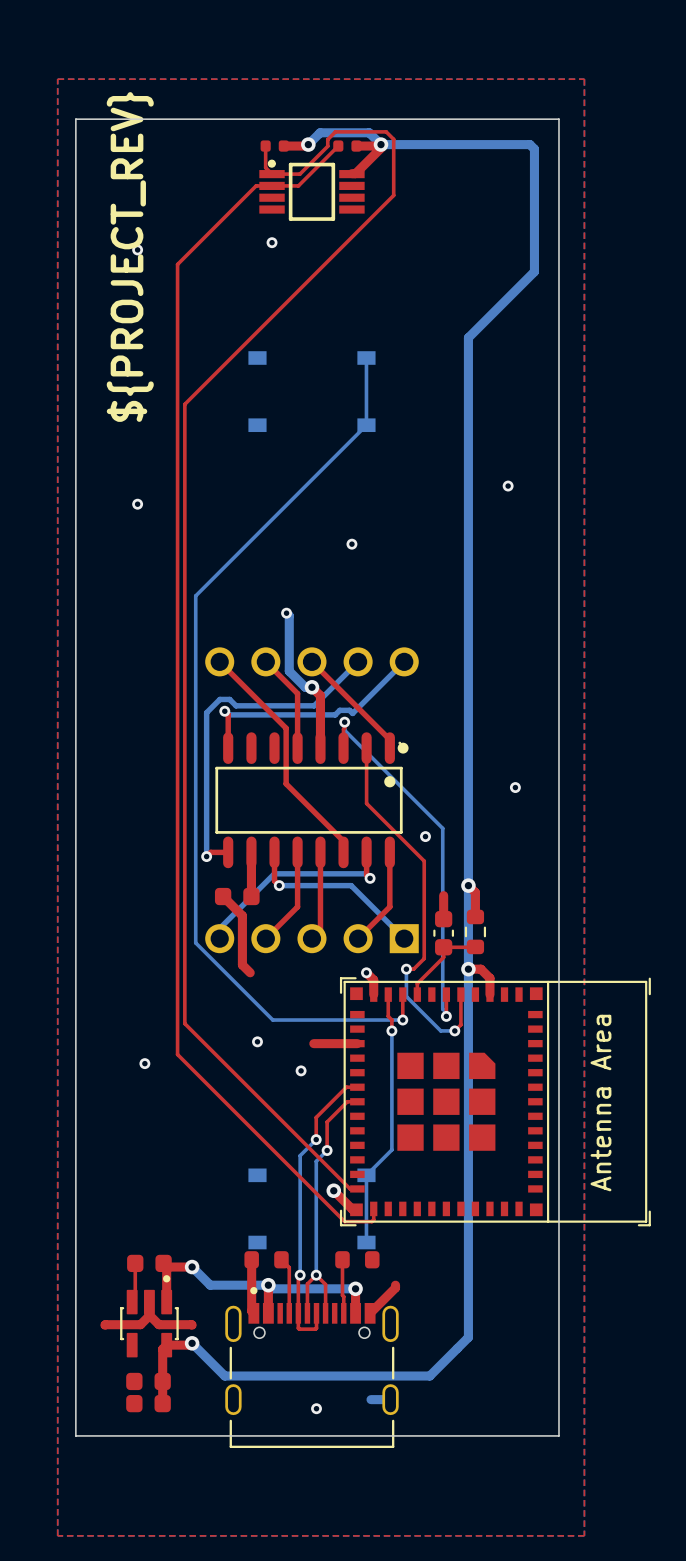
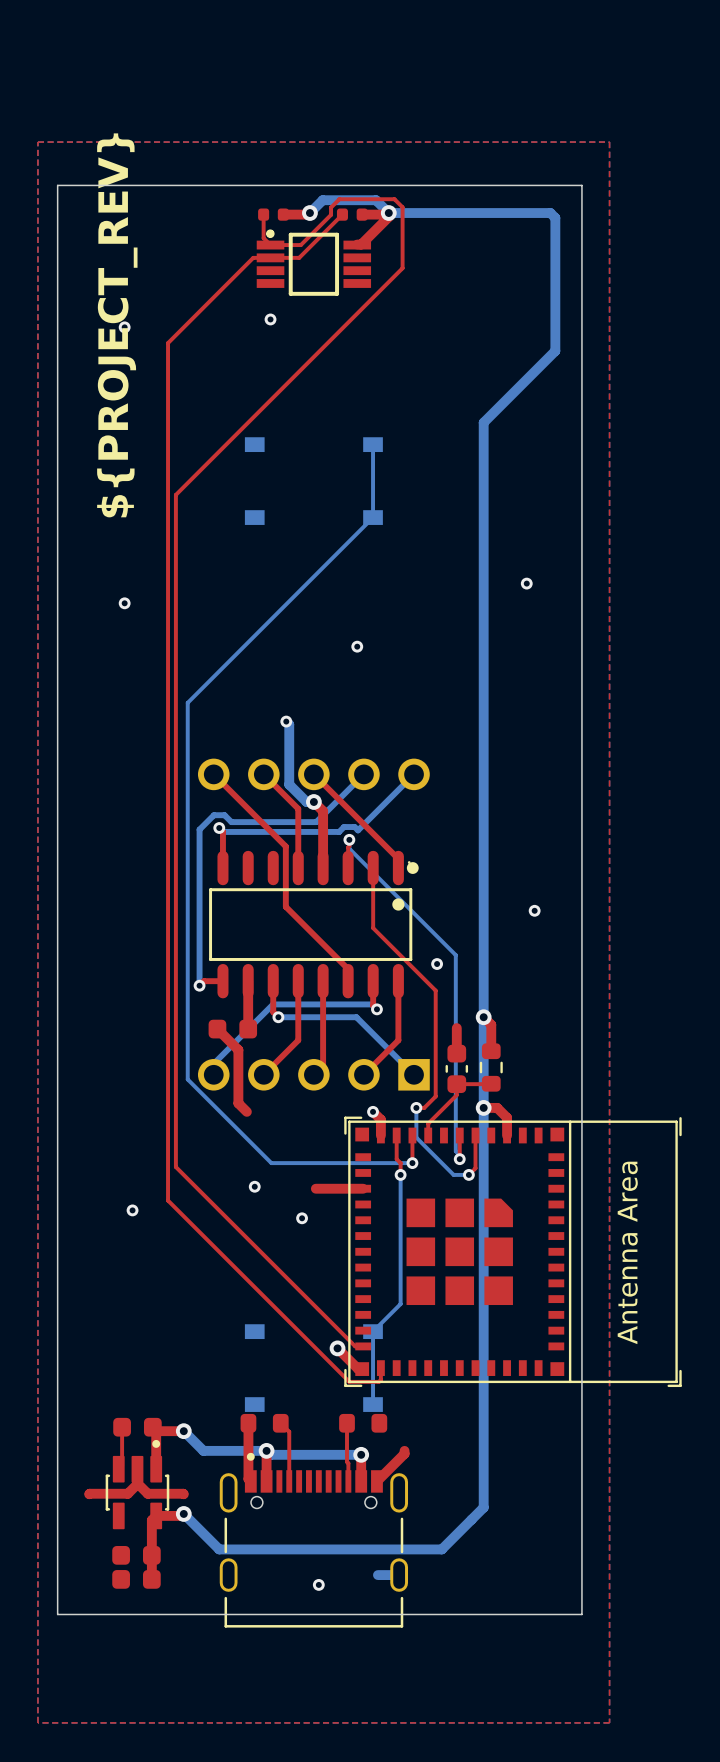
top track: (357, 1087) (346, 1087) (316, 1117) (316, 1139) -> none
top track: (357, 1101) (347, 1101) (327, 1122) (327, 1150) -> none
bottom track: (316, 1139) (300, 1155) (300, 1275) -> none
via: (316, 1139) -> none
bottom track: (327, 1150) (316, 1161) (316, 1275) -> none
via: (327, 1150) -> none
top track: (300, 1275) (298, 1277) (298, 1328) (315, 1329) (316, 1313) -> none
via: (300, 1275) -> none
via: (316, 1275) -> none
top track: (307, 1313) (307, 1284) (316, 1275) (325, 1284) (325, 1313) -> none

